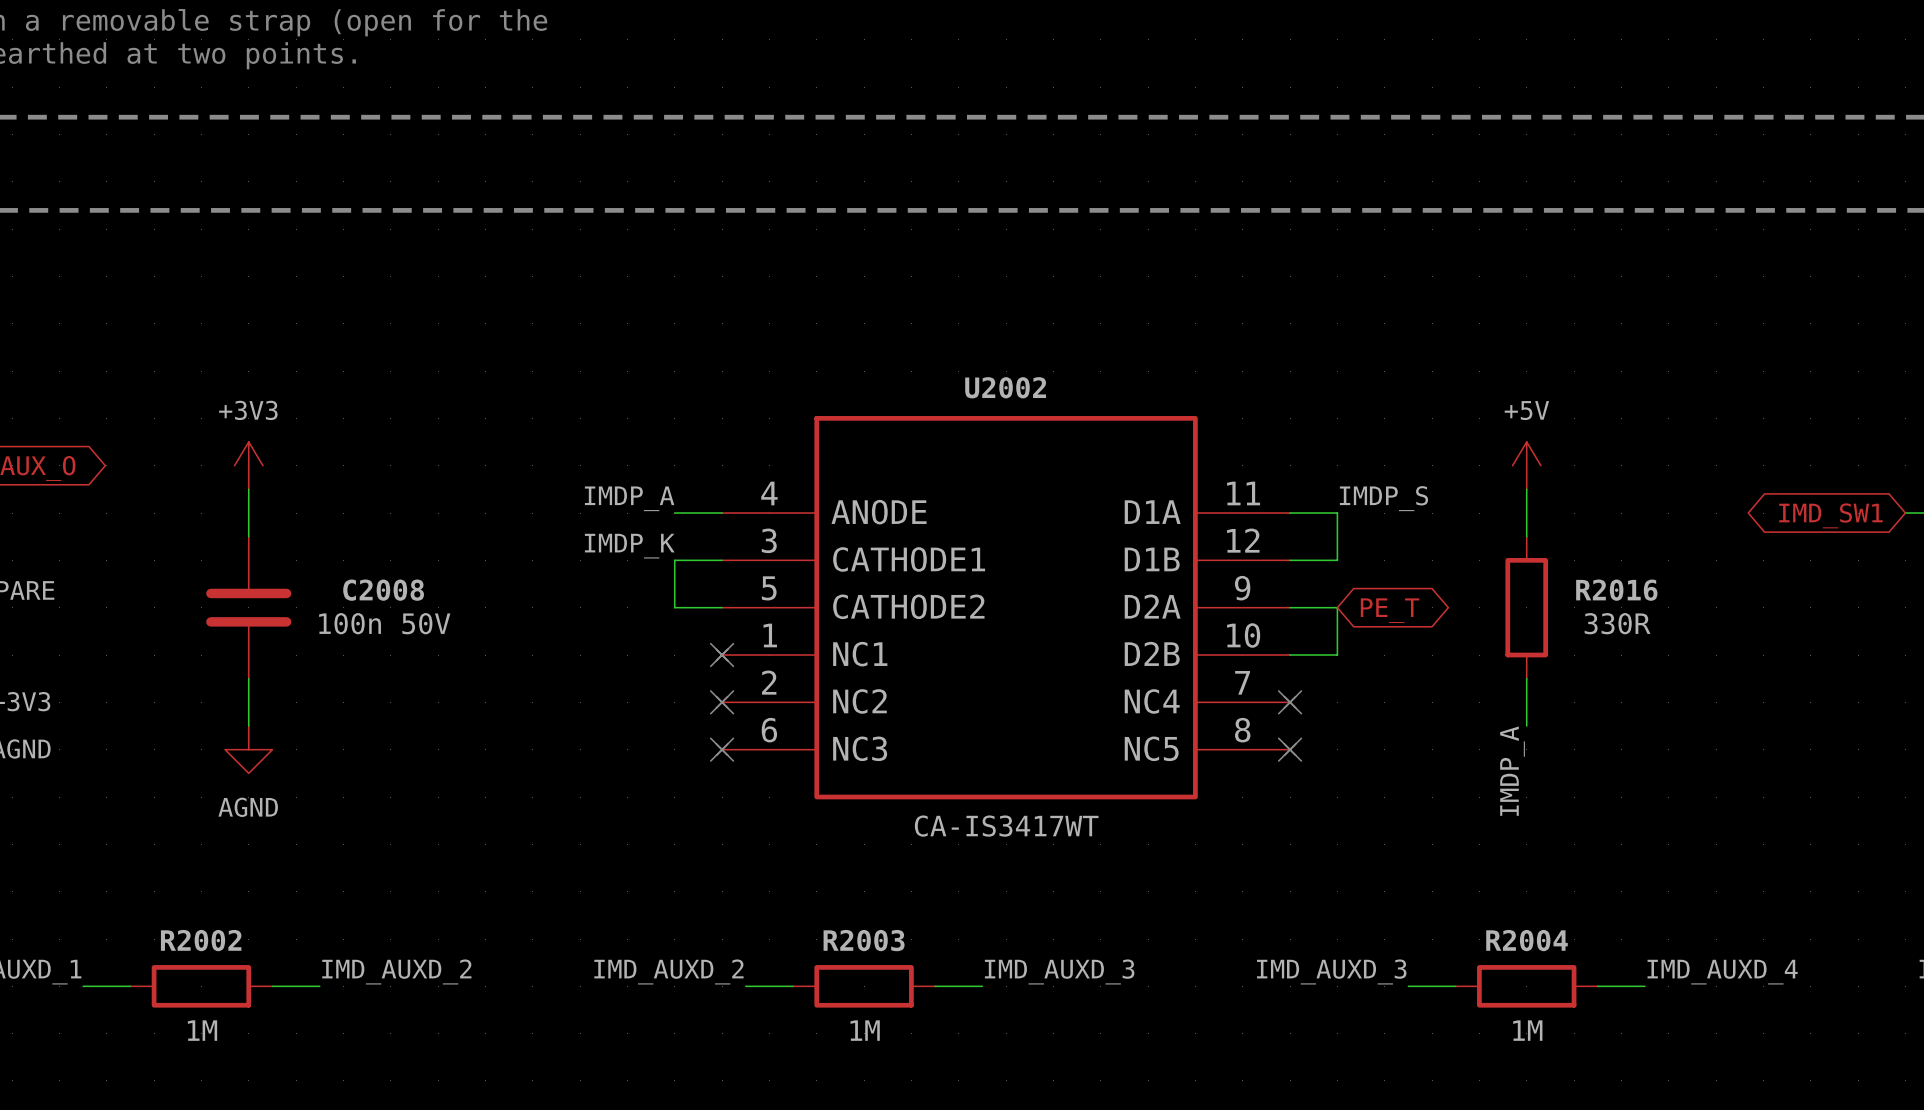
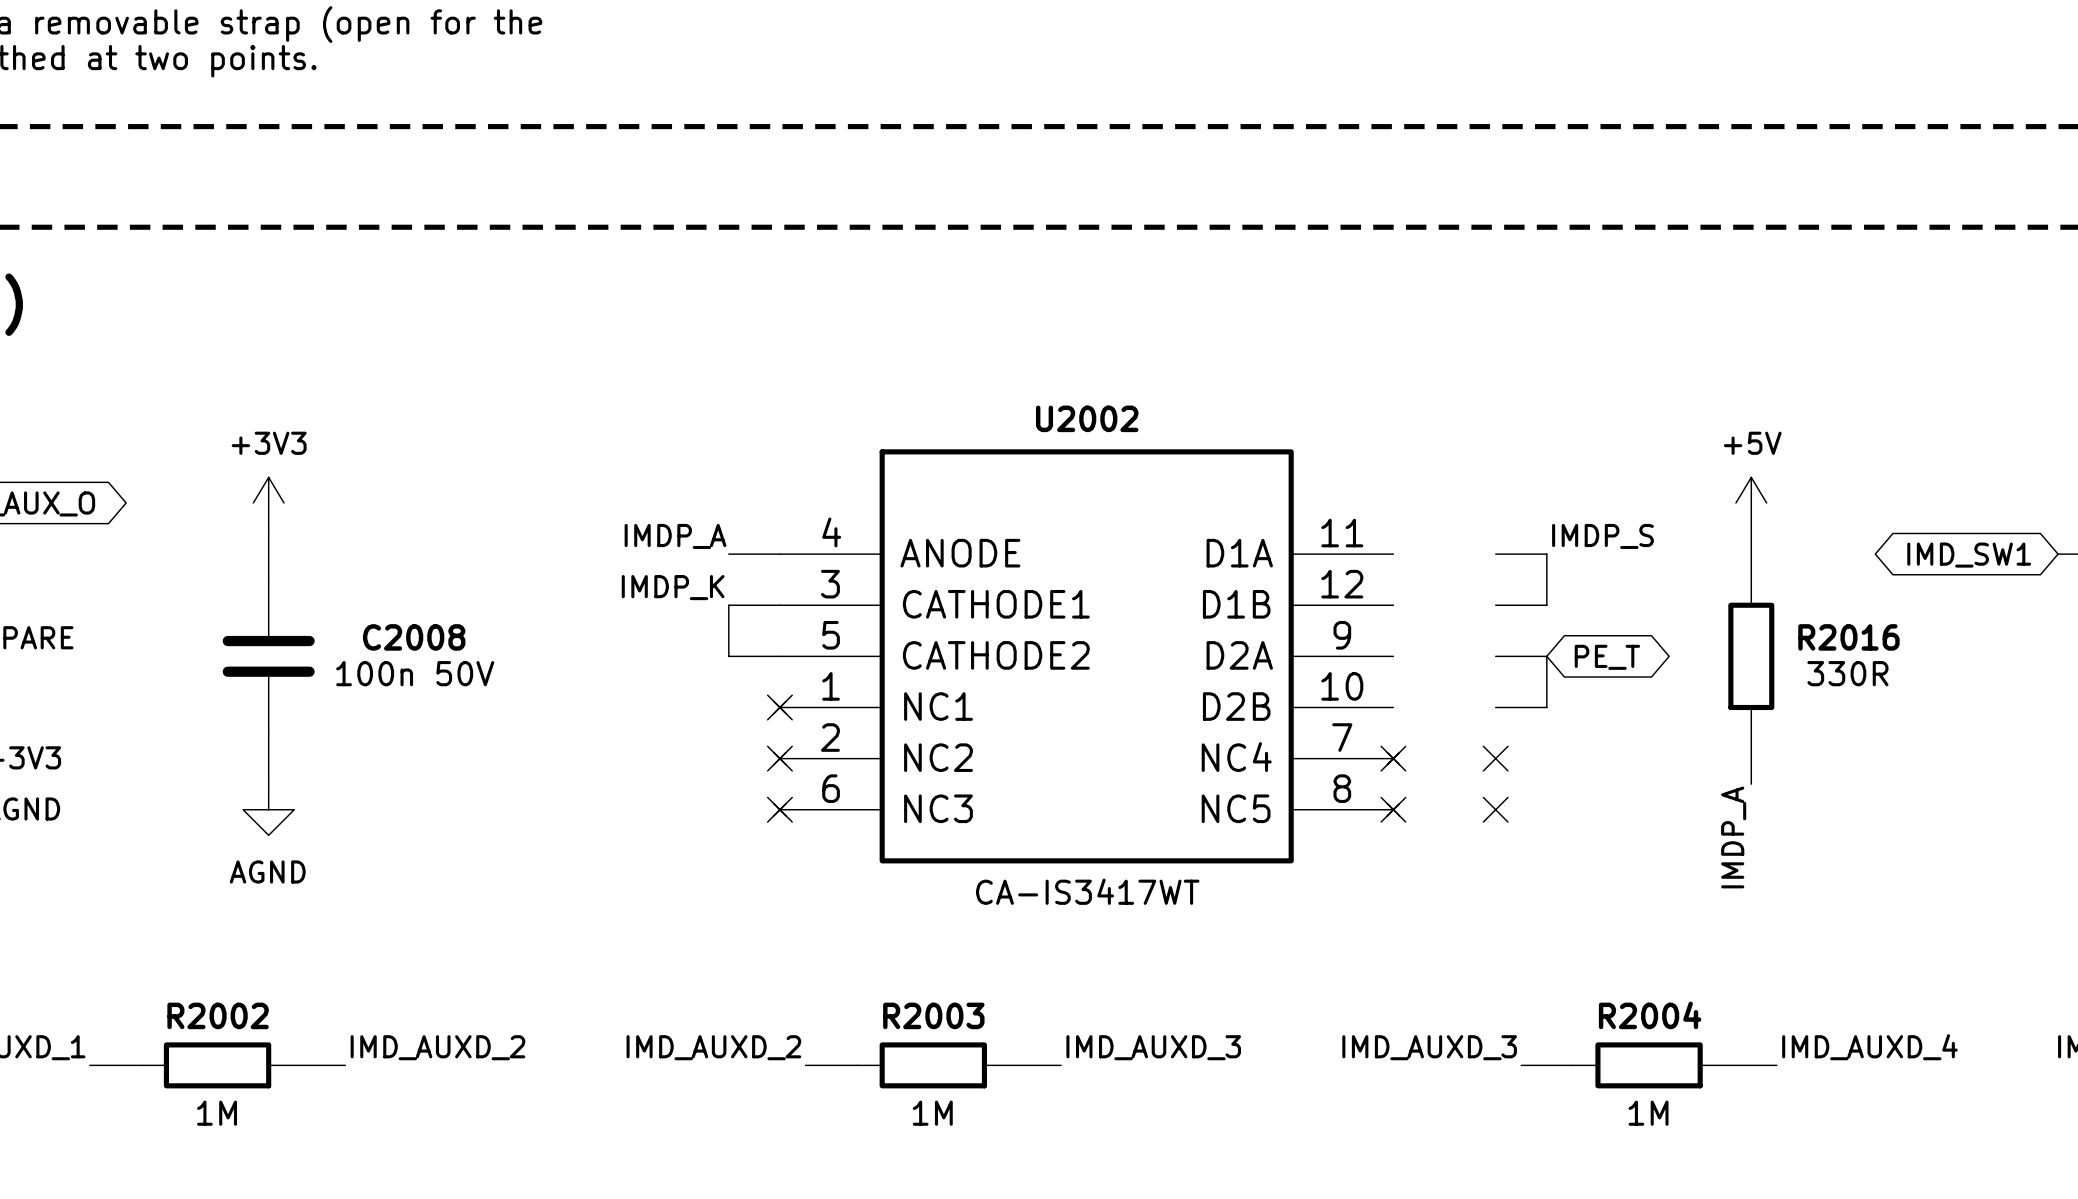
power symbol position: +5V (1526, 465) -> +5V (1751, 502)
wire: (1526, 489) (1526, 536) -> (1751, 528) (1751, 579)
label position: IMDP_S (1383, 498) -> IMDP_S (1602, 536)
wire: (1290, 513) (1337, 513) (1337, 560) (1290, 560) -> (1495, 554) (1546, 554) (1546, 605) (1495, 605)
wire: (1290, 607) (1337, 607) (1337, 655) (1290, 655) -> (1495, 656) (1546, 656) (1546, 707) (1495, 707)
R2016 position: (1526, 607) -> (1751, 656)
global label position: PE_T (1390, 610) -> PE_T (1607, 657)
wire: (1526, 678) (1526, 726) -> (1751, 733) (1751, 784)
no-connect mark: none -> (1495, 758)
no-connect mark: none -> (1495, 809)
label position: IMDP_A (1512, 771) -> IMDP_A (1733, 837)

